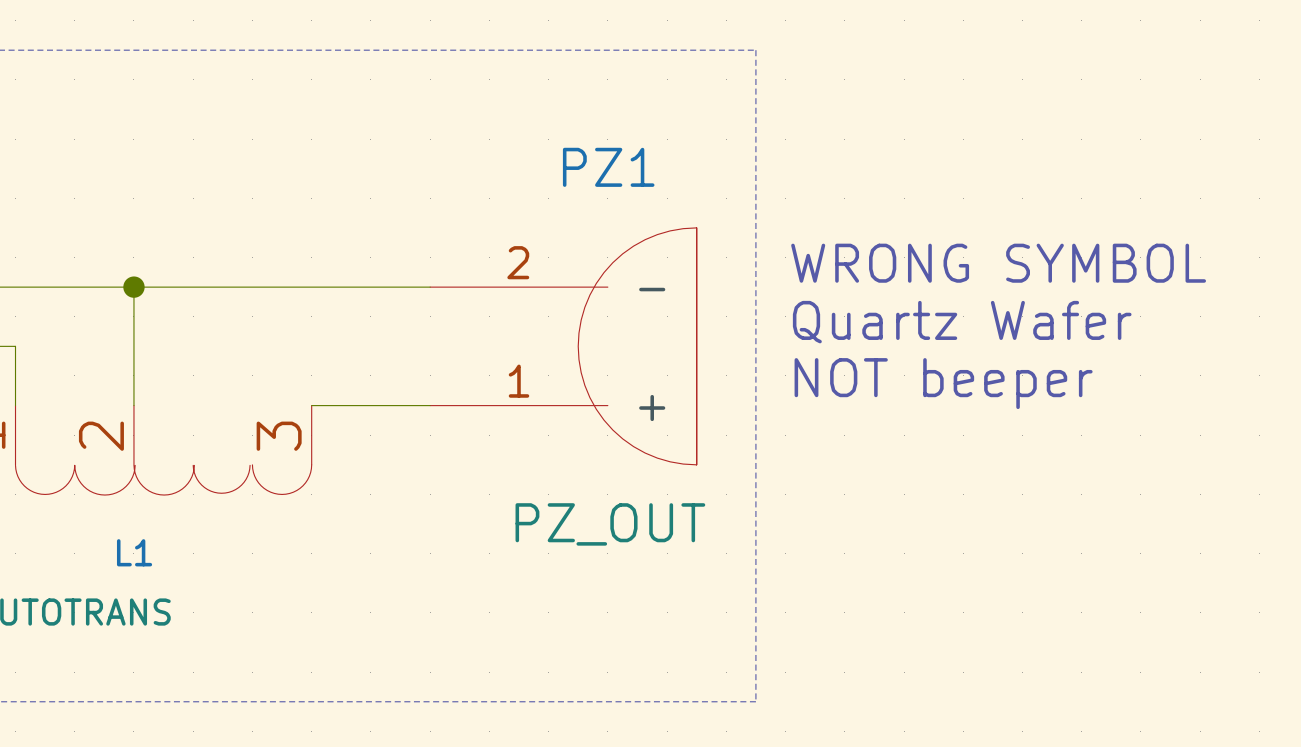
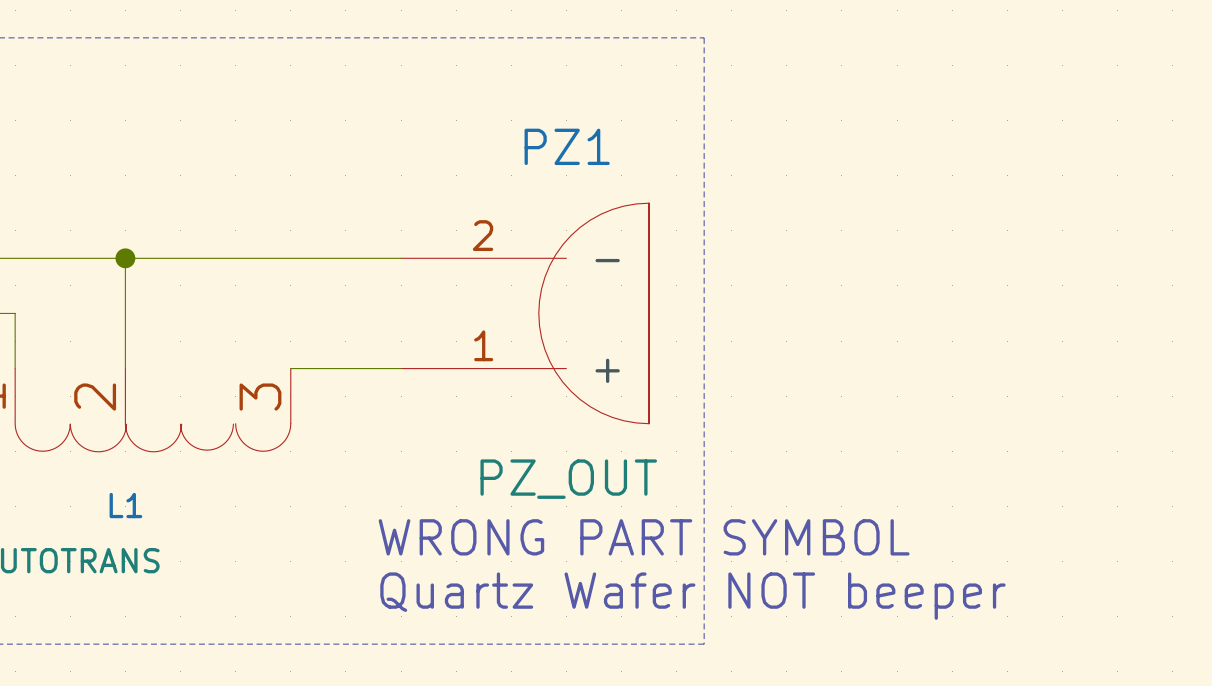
text: WRONG SYMBOL (998, 263) -> none
text: Quartz Wafer (962, 322) -> none
text: NOT beeper (943, 383) -> none
text: none -> WRONG PART SYMBOL (644, 537)
text: none -> Quartz Wafer NOT beeper (692, 596)

